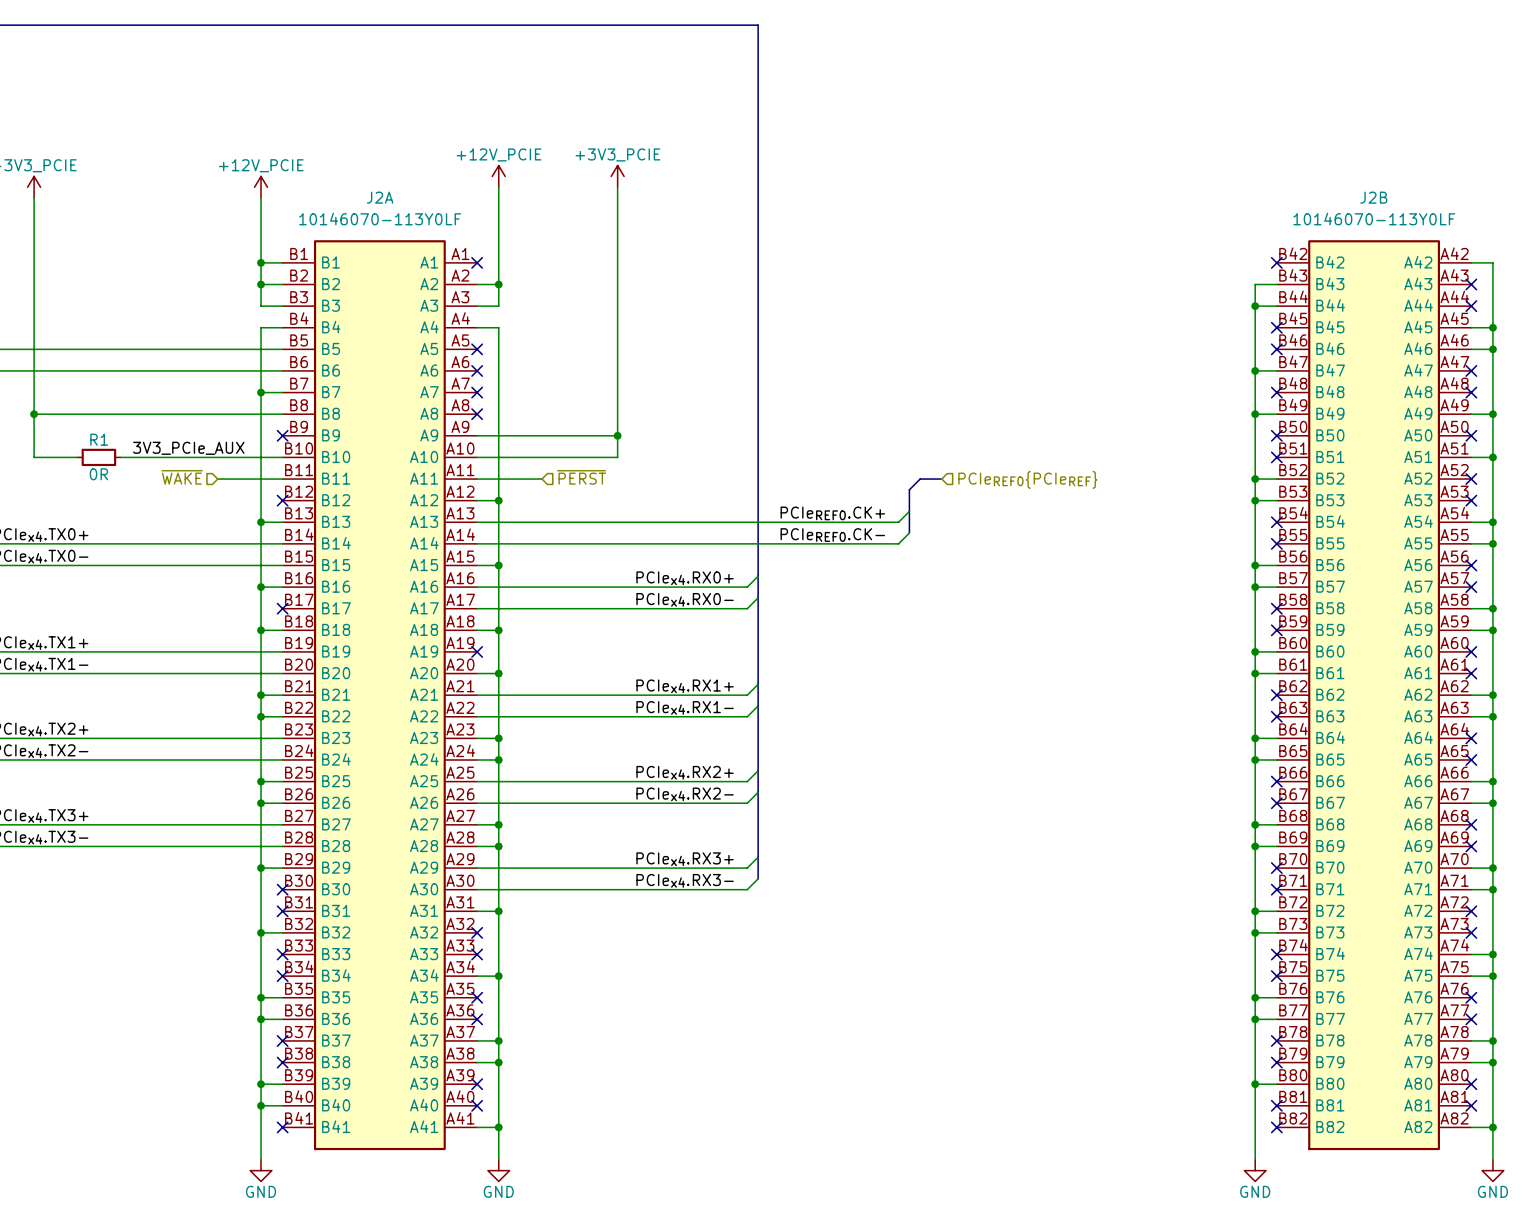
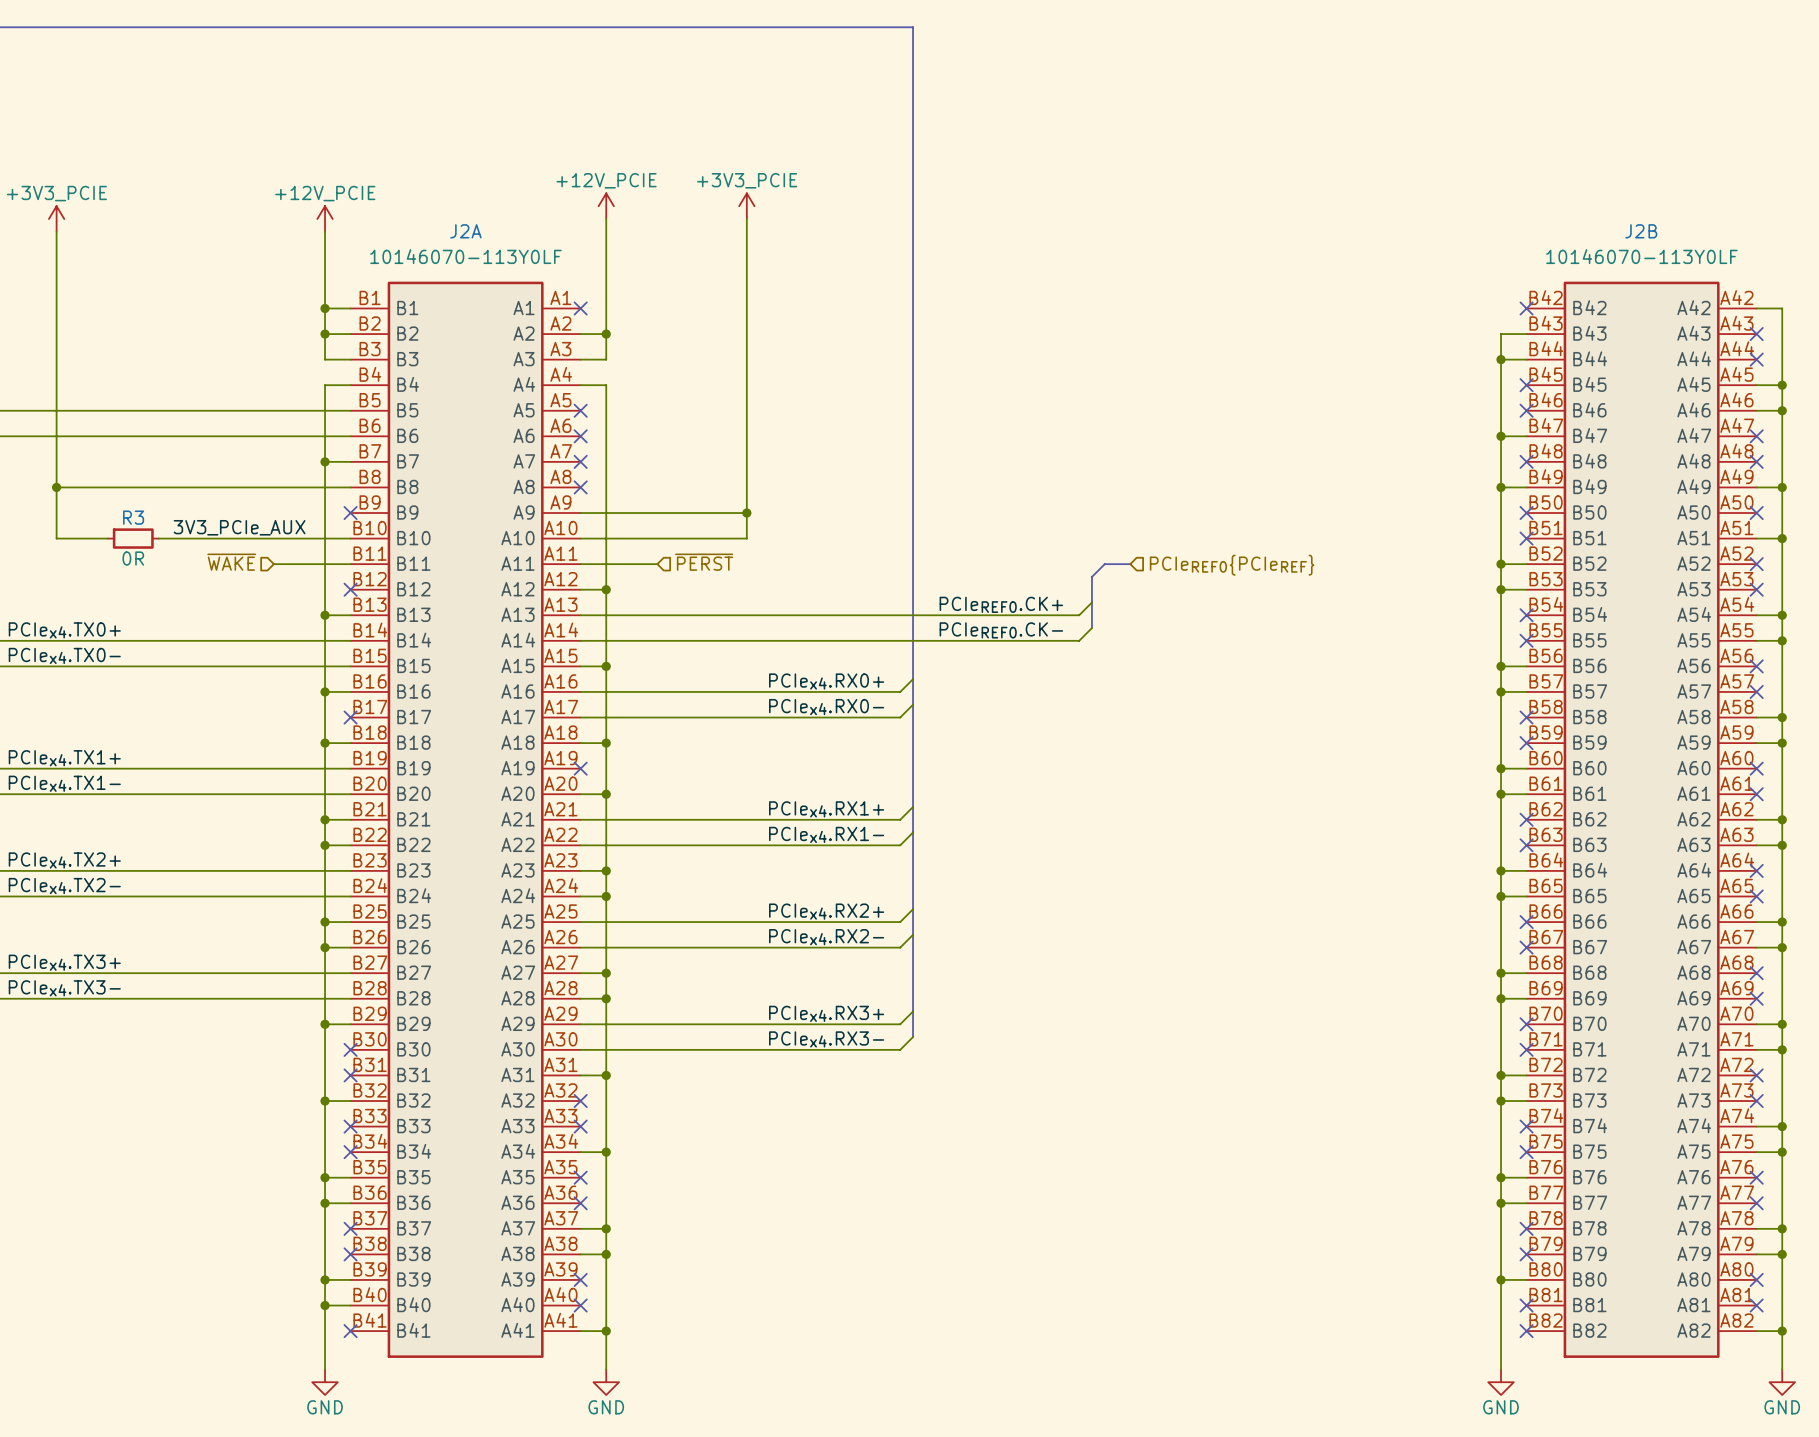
R1 name: R1 (99, 439) -> R3 (133, 517)

